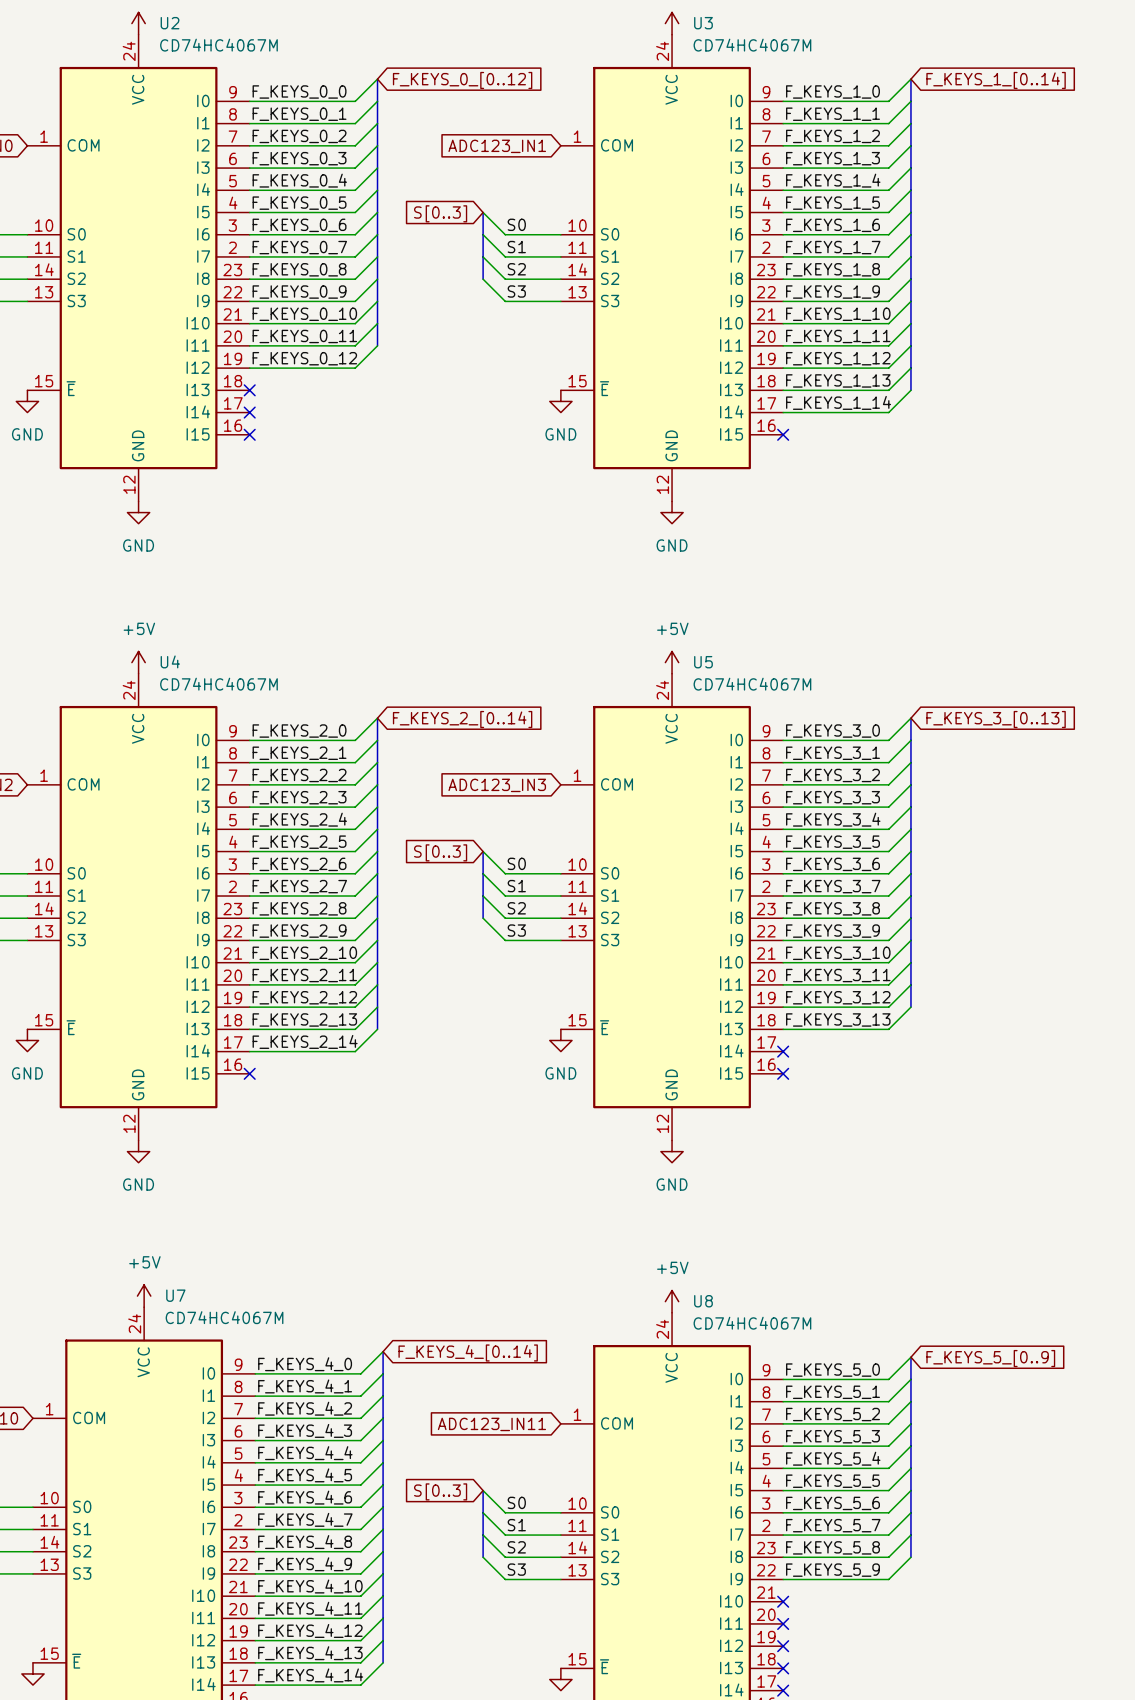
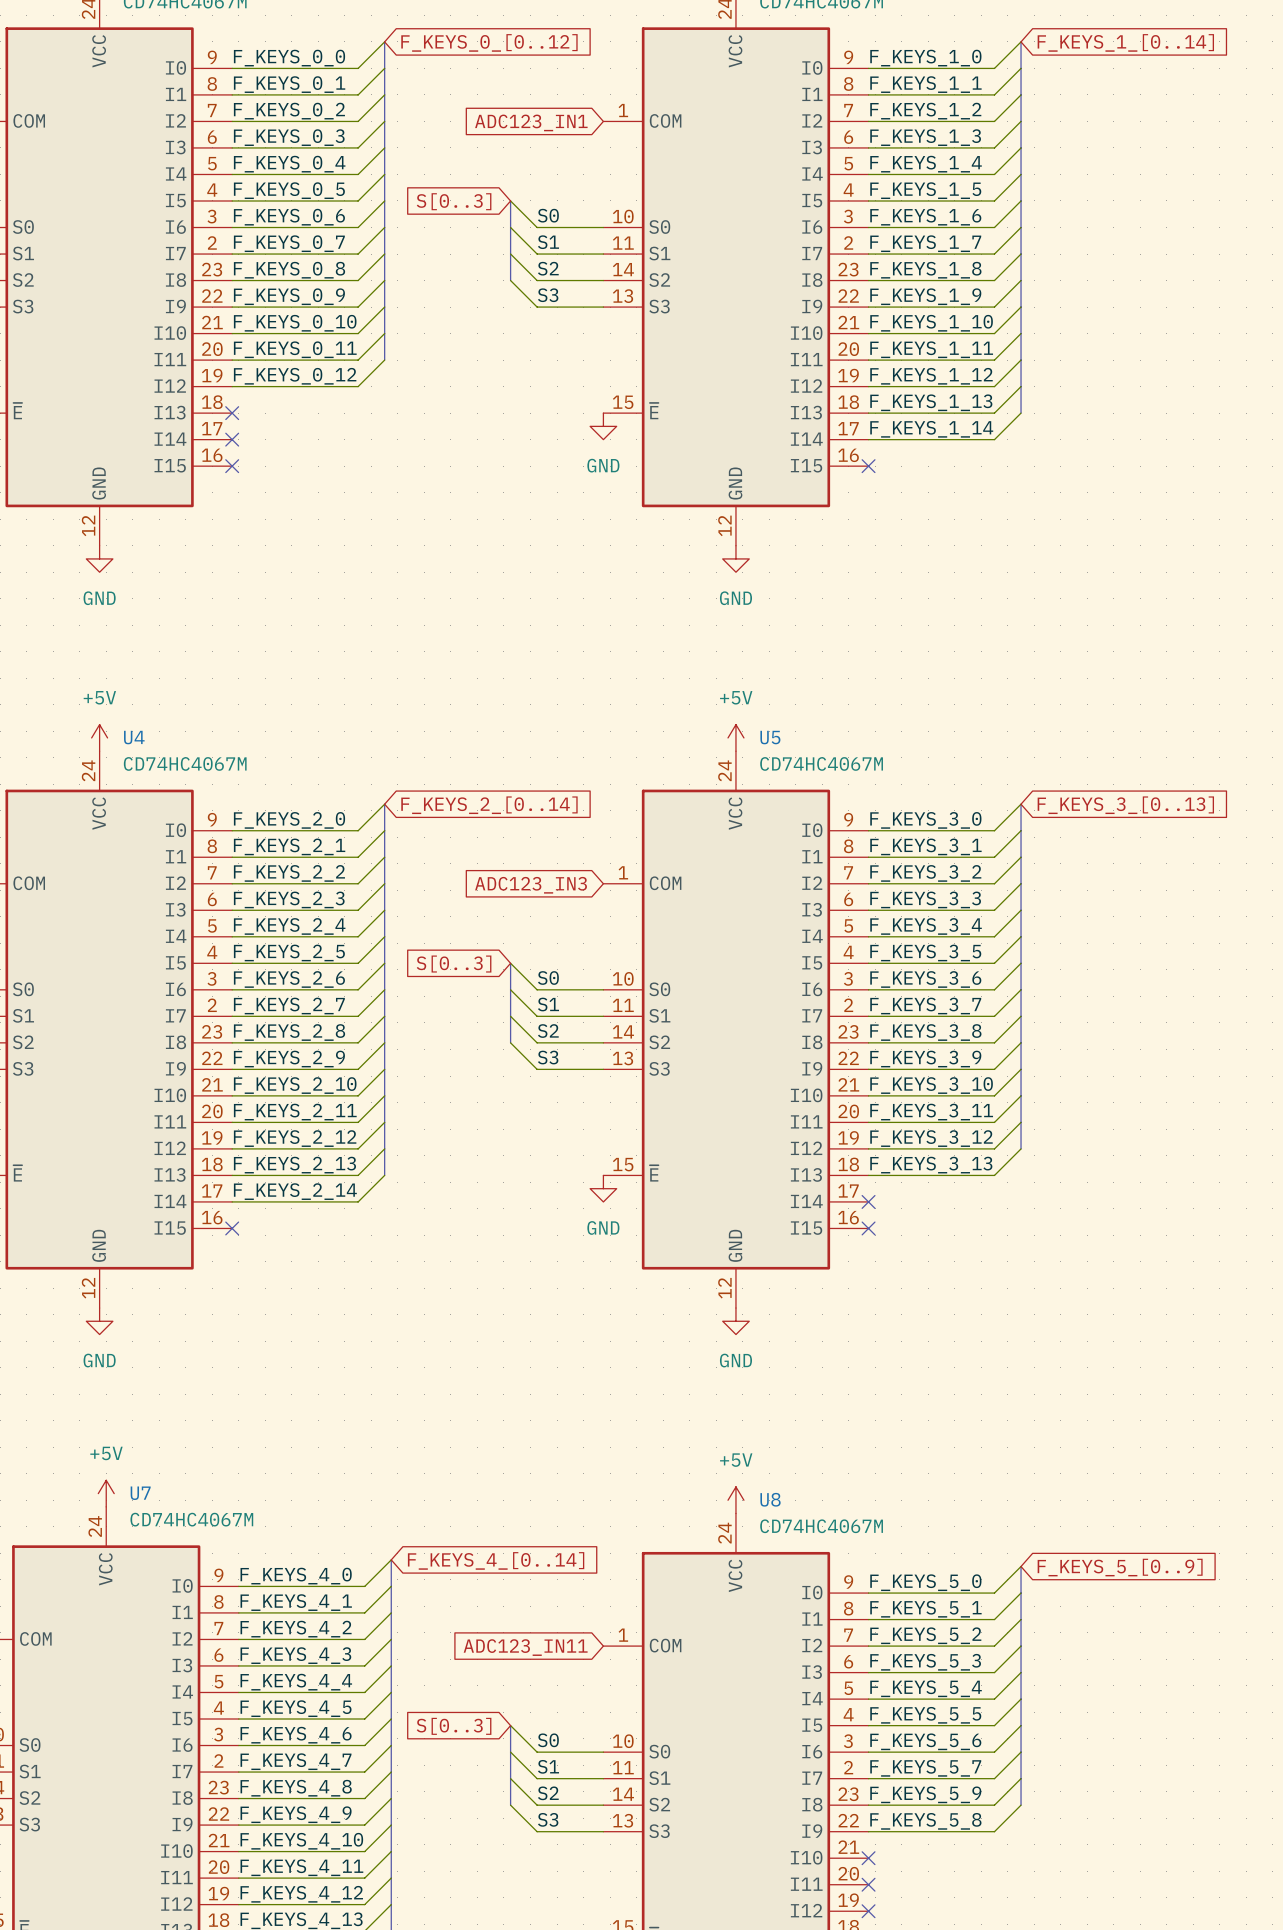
label: F_KEYS_5_8 (832, 1547) -> F_KEYS_5_9 (925, 1794)
label: F_KEYS_5_9 (832, 1570) -> F_KEYS_5_8 (925, 1821)

